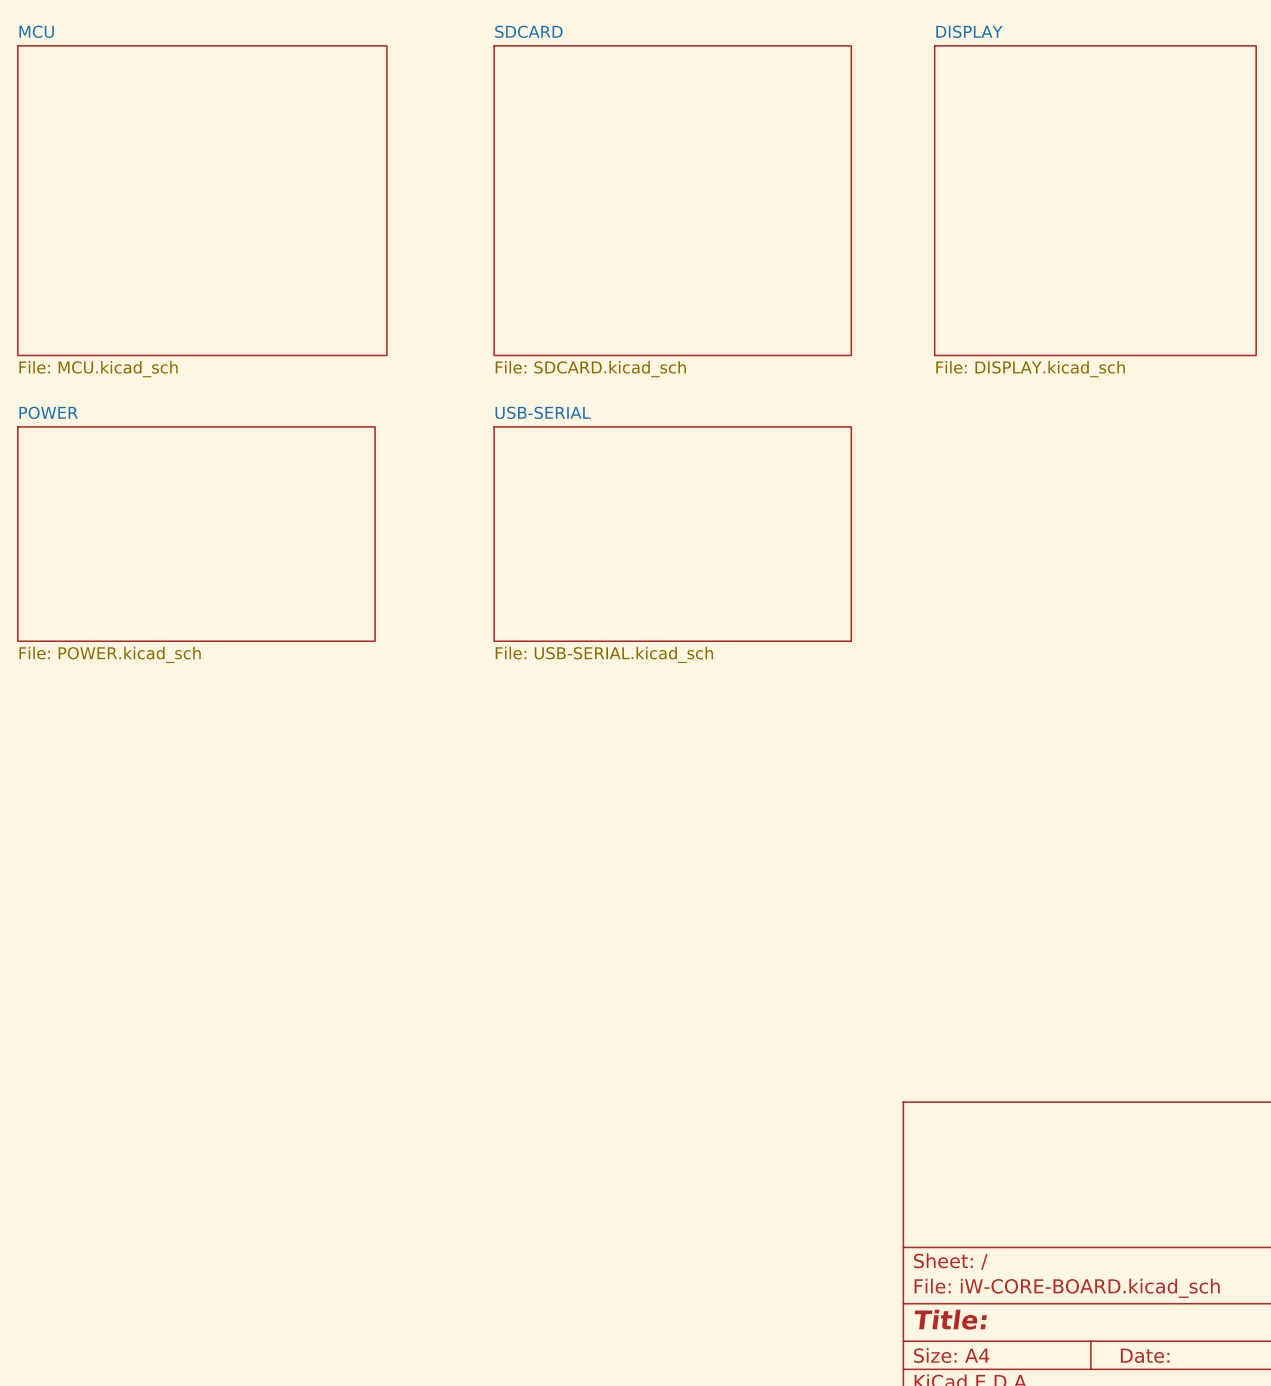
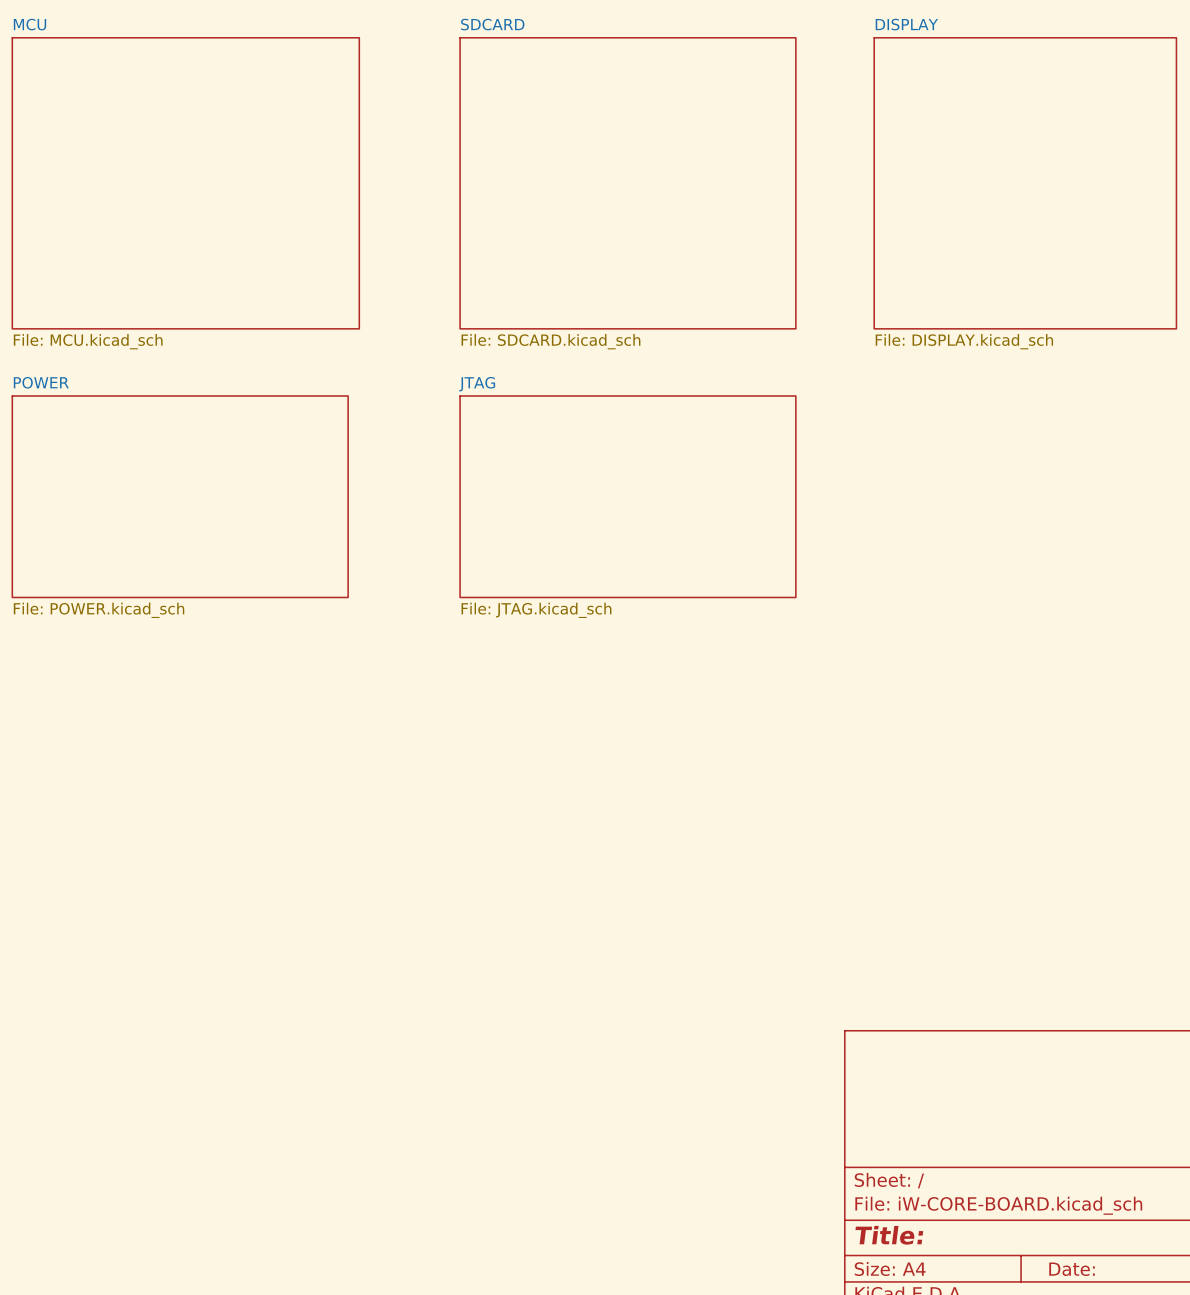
sheet USB-SERIAL name: USB-SERIAL (543, 412) -> JTAG (477, 384)
sheet USB-SERIAL value: File: USB-SERIAL.kicad_sch (604, 654) -> File: JTAG.kicad_sch (536, 610)

